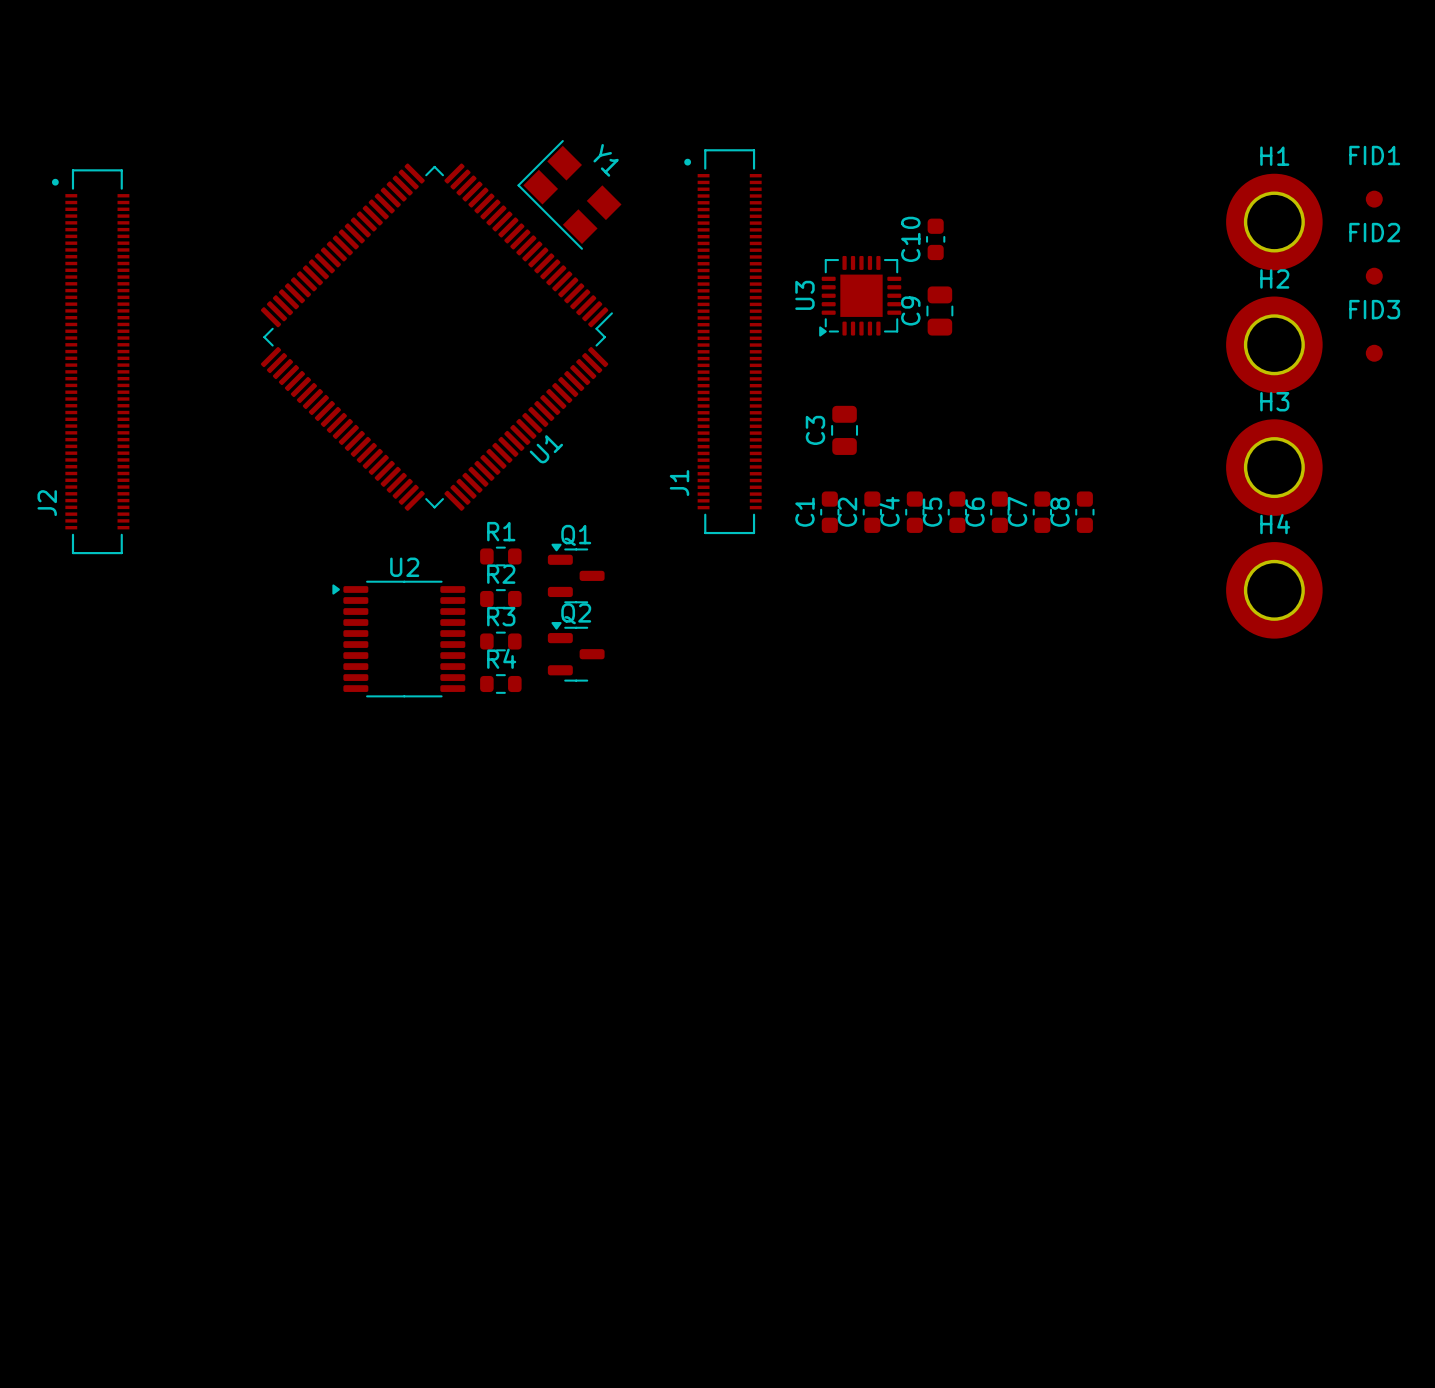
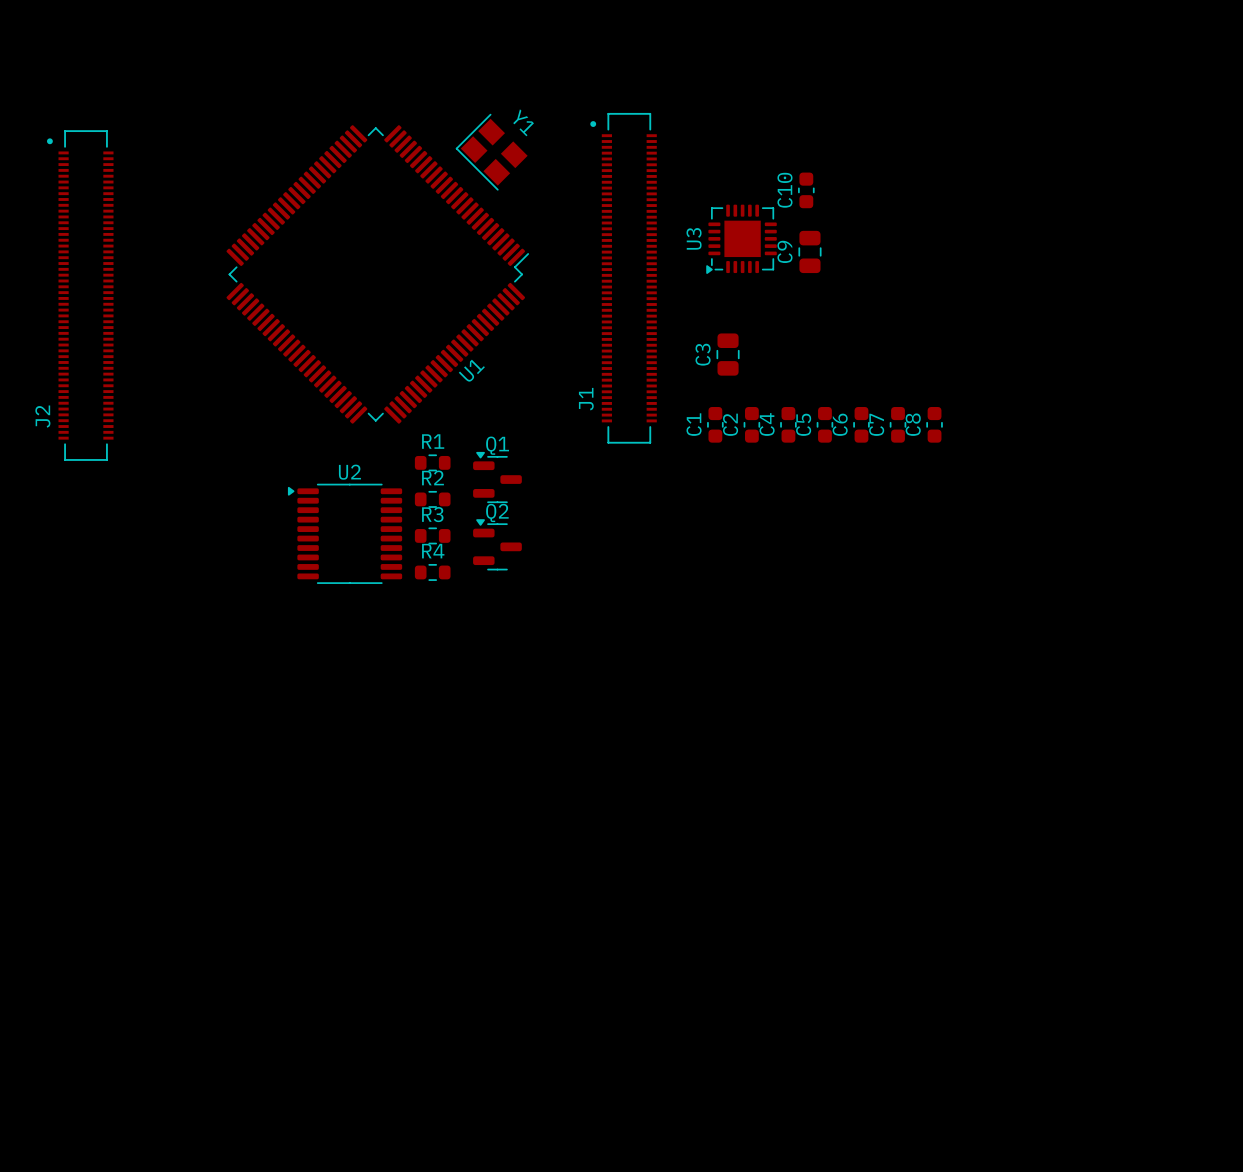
Y1 footprint: [517, 140, 622, 250] -> [455, 113, 528, 191]
FID1: (1374, 199) -> none
H1: (1274, 222) -> none
FID2: (1374, 276) -> none
H2: (1274, 344) -> none
FID3: (1374, 353) -> none
H3: (1274, 467) -> none
H4: (1274, 590) -> none

